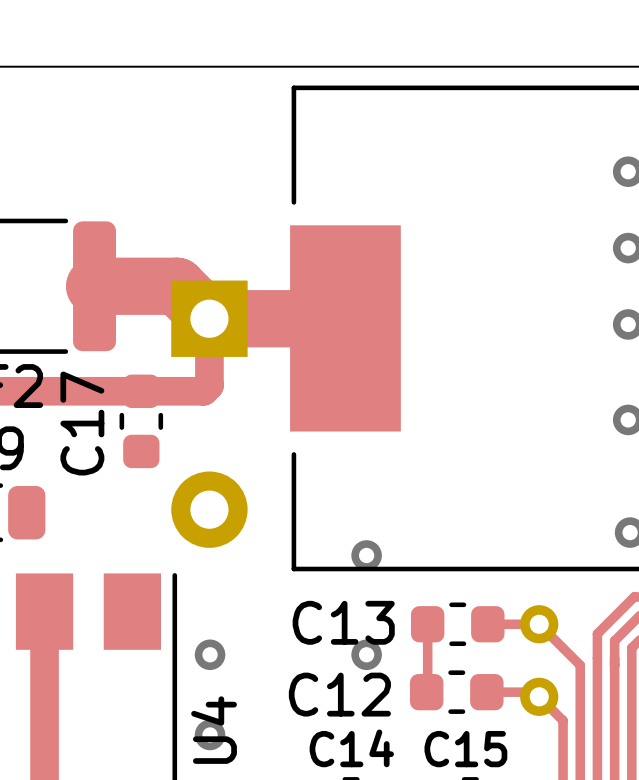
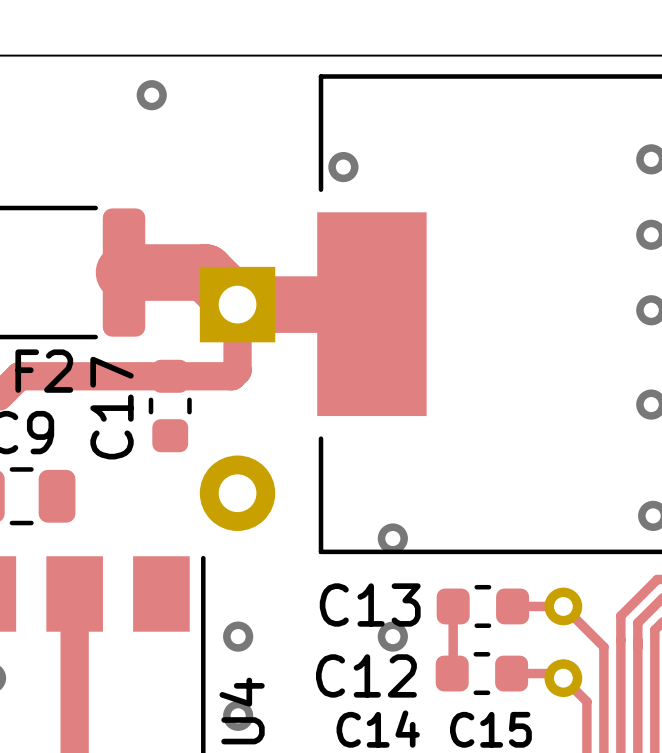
via: none -> (151, 95)
via: none -> (343, 167)

